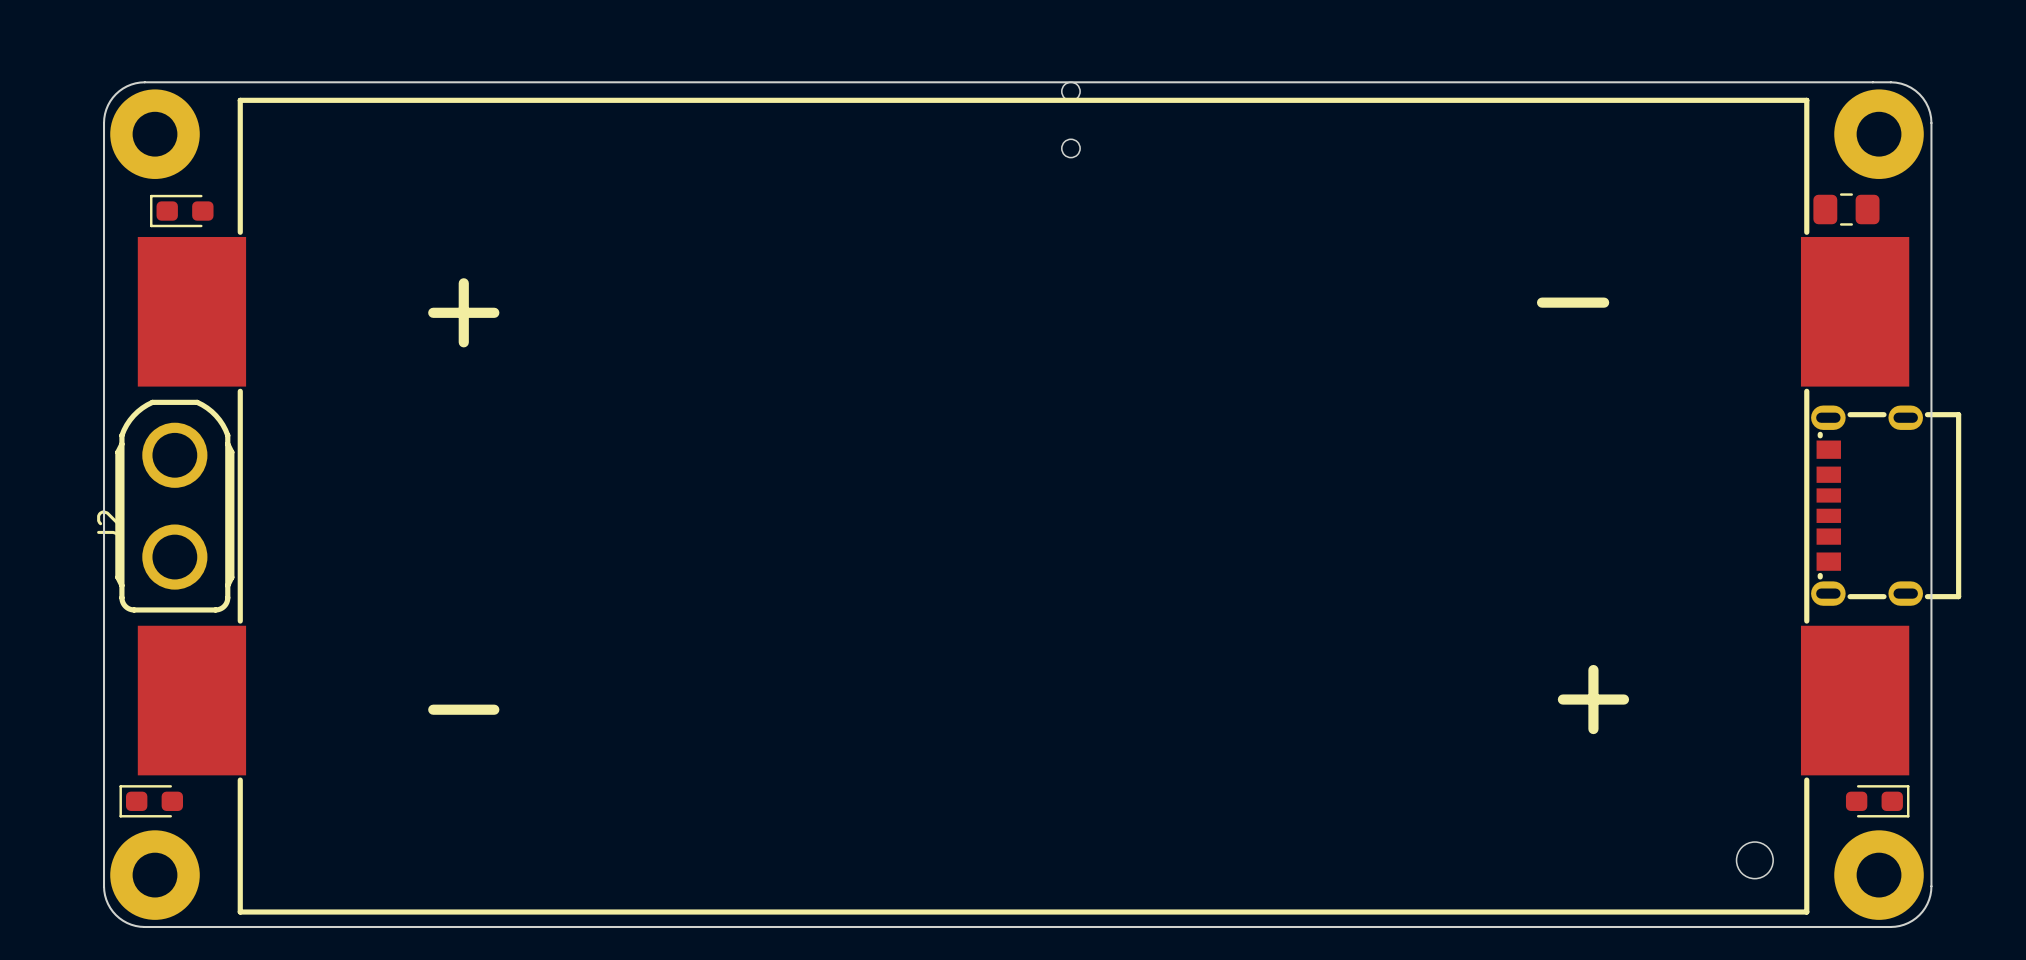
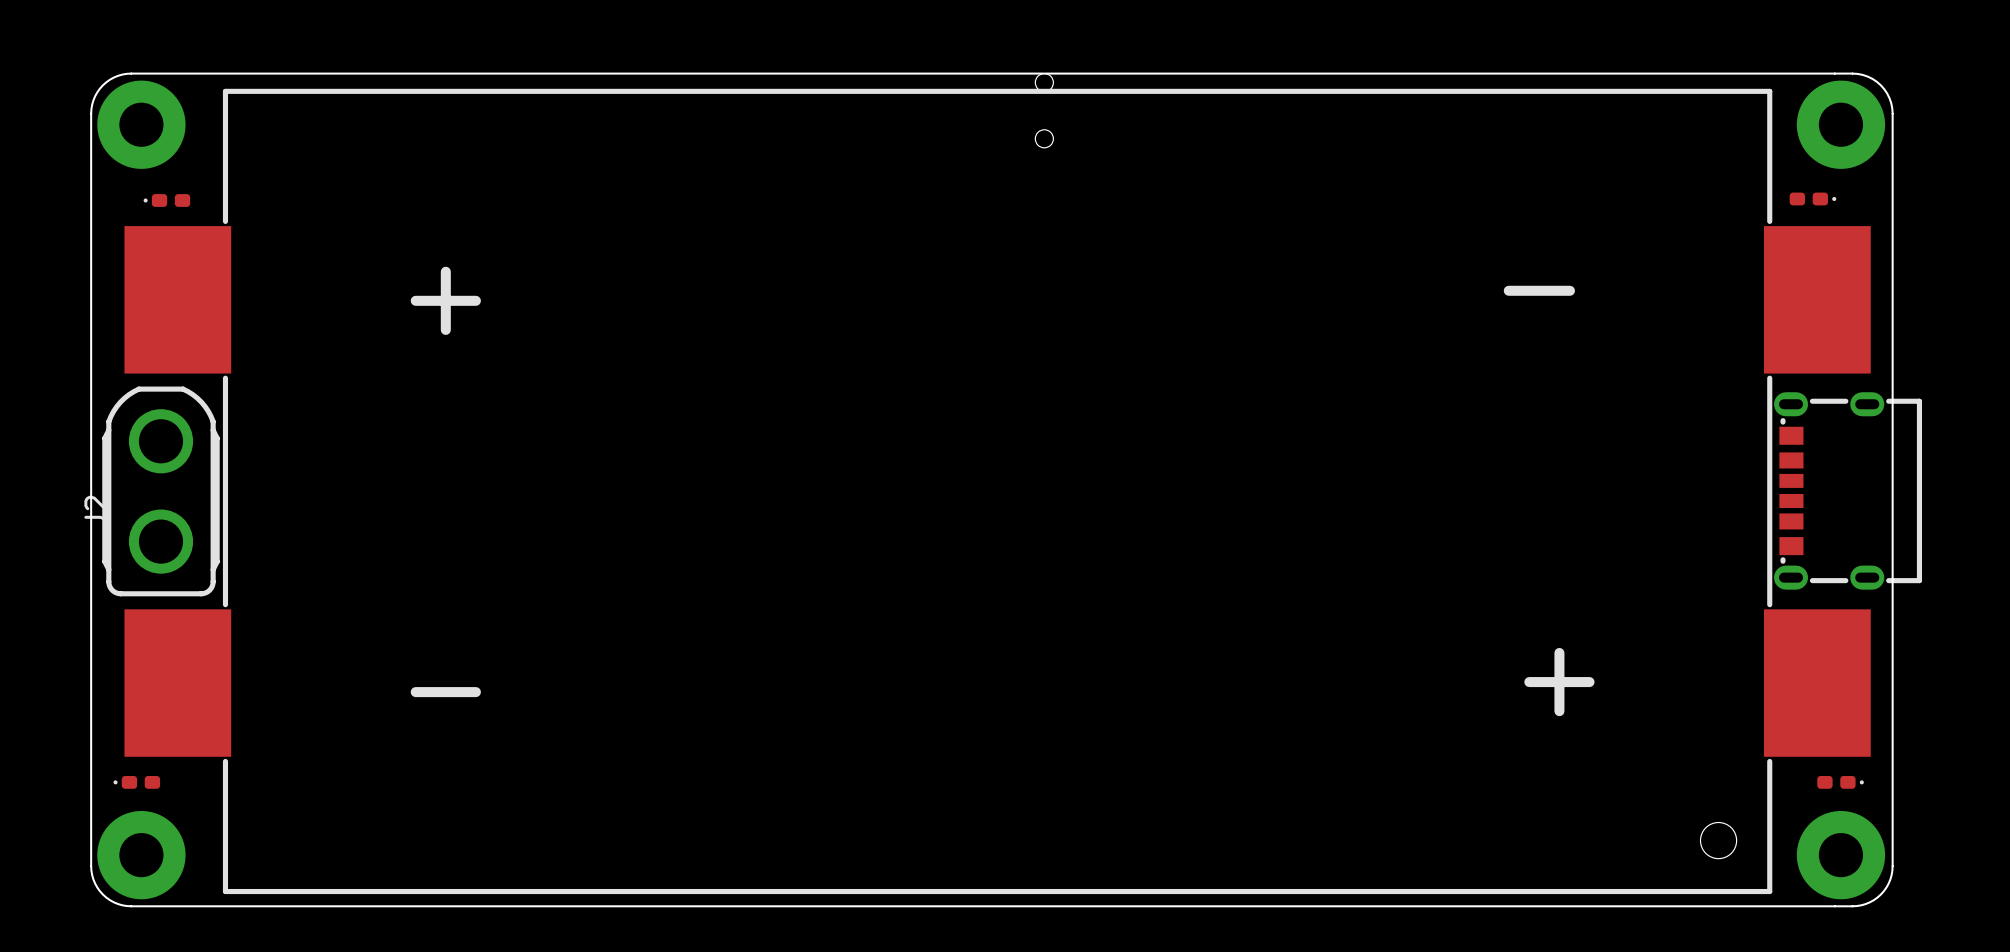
part footprint: [1813, 193, 1880, 226] -> [1789, 192, 1837, 206]
part footprint: [150, 194, 214, 228] -> [143, 194, 191, 207]
part footprint: [119, 785, 183, 818] -> [113, 775, 161, 789]
part footprint: [1845, 785, 1910, 818] -> [1817, 775, 1864, 789]

